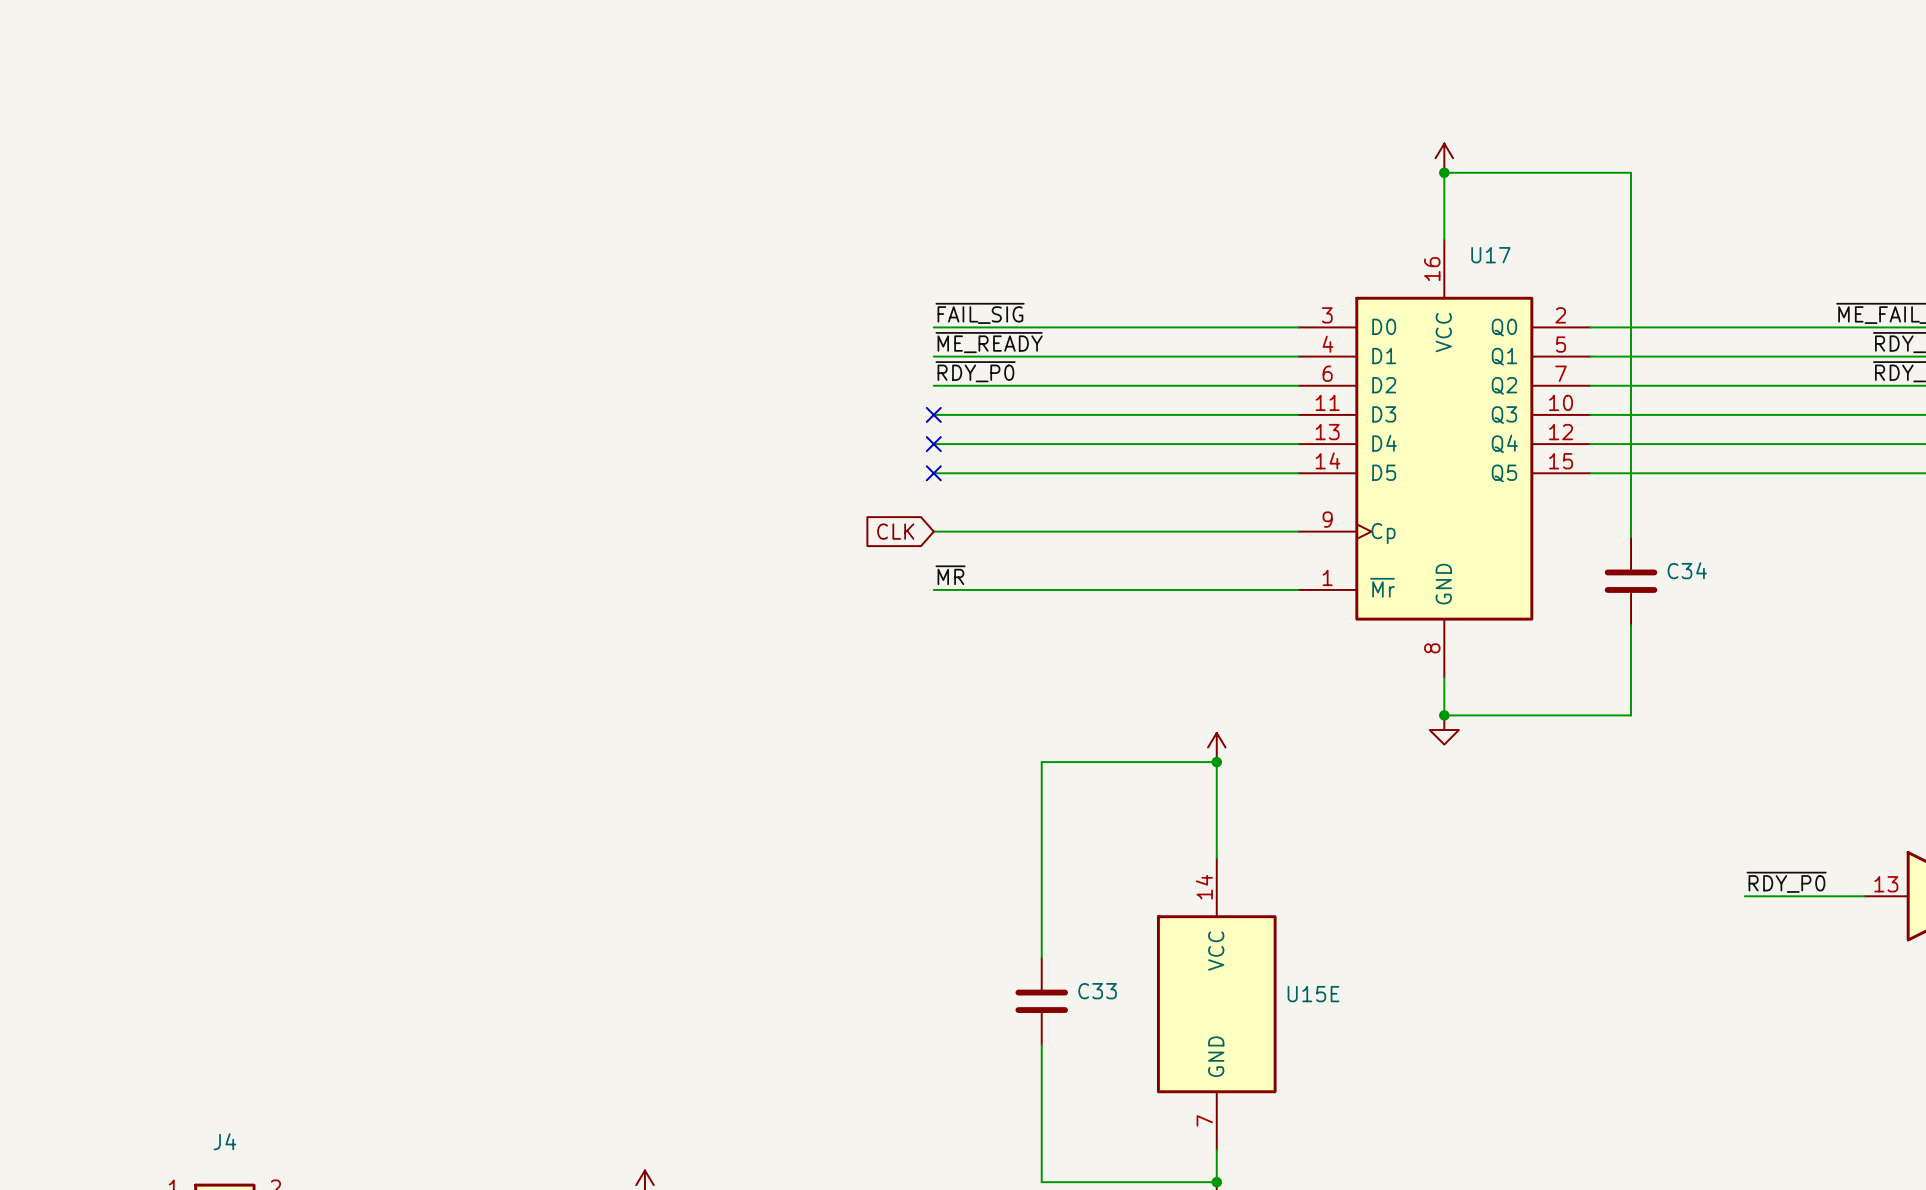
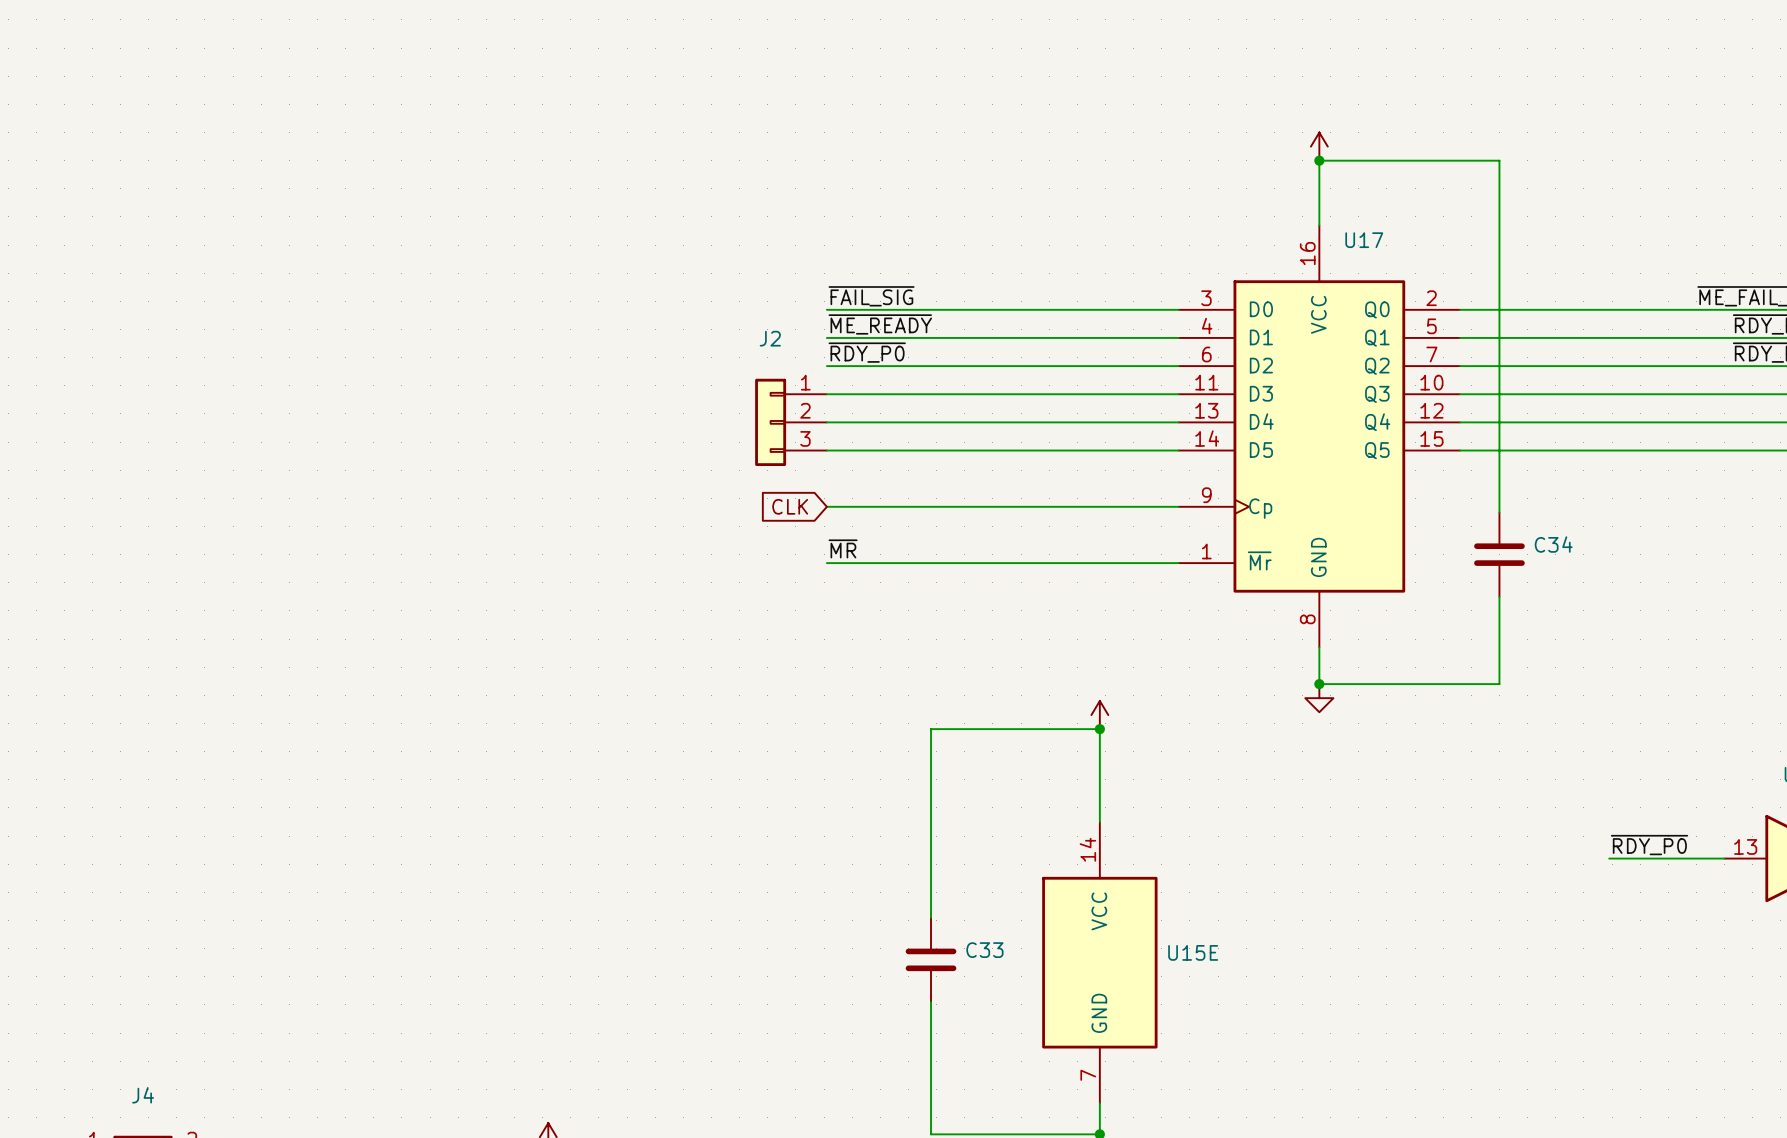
no-connect mark: (933, 414) -> none
J2: none -> (791, 422)
no-connect mark: (933, 444) -> none
no-connect mark: (933, 473) -> none

